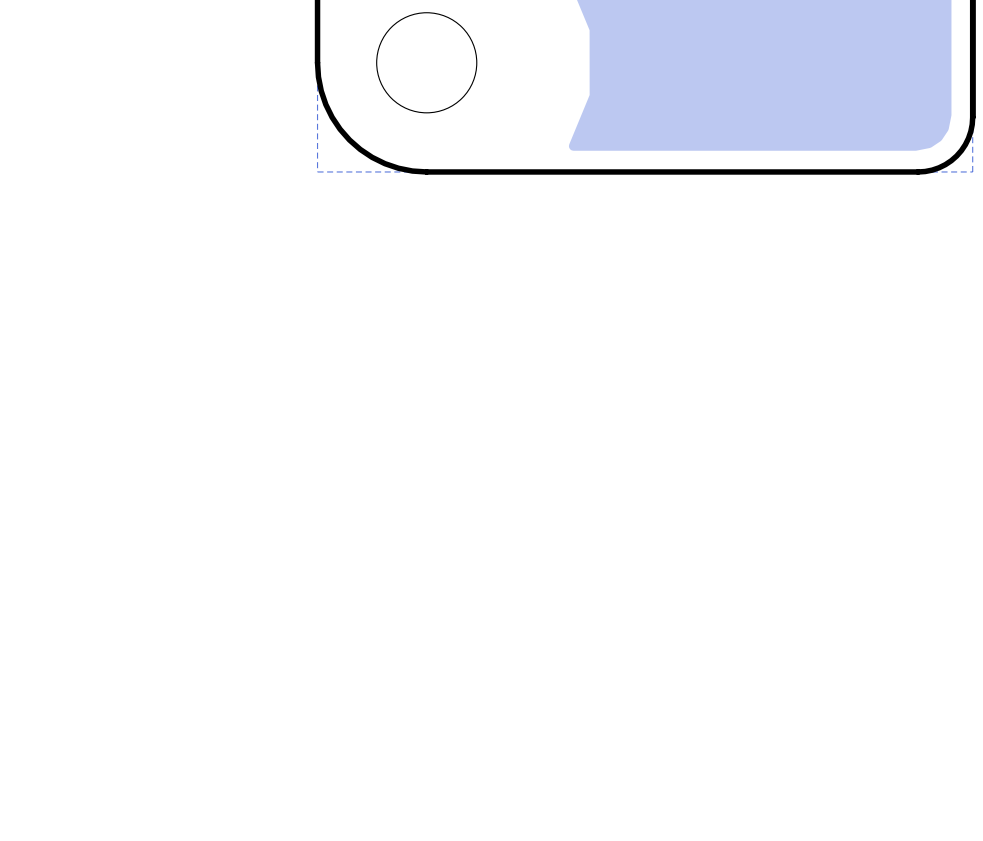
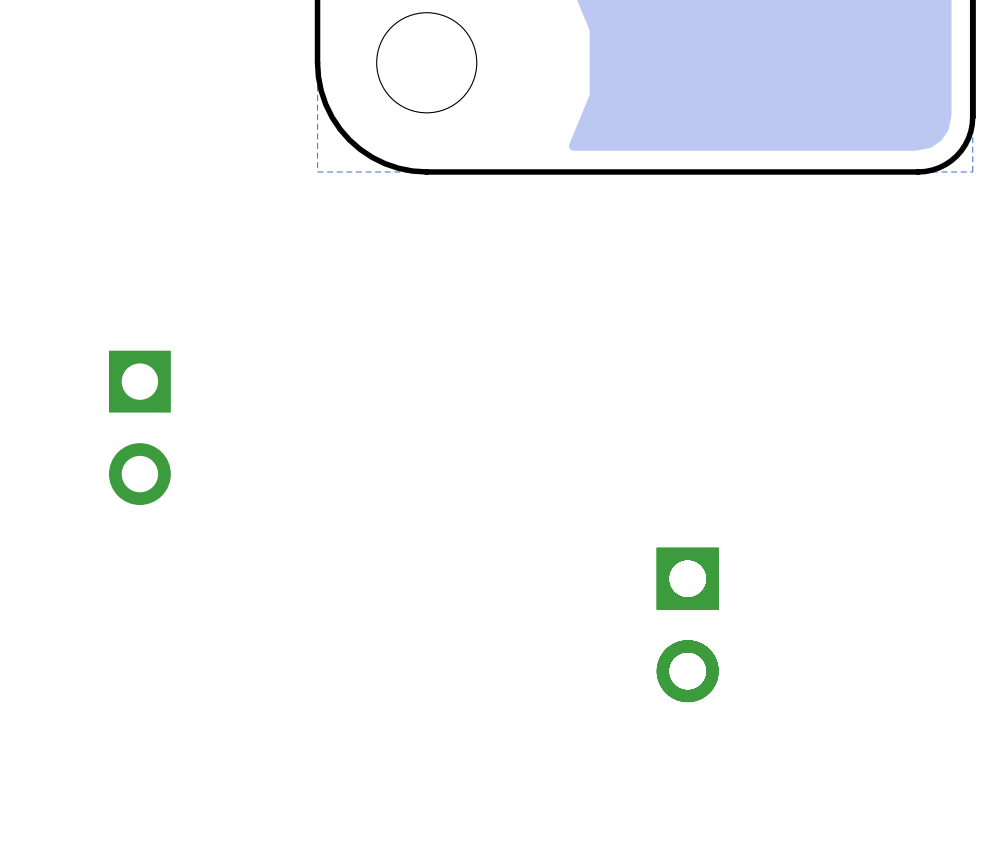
part: none -> (139, 427)
part: none -> (687, 624)

